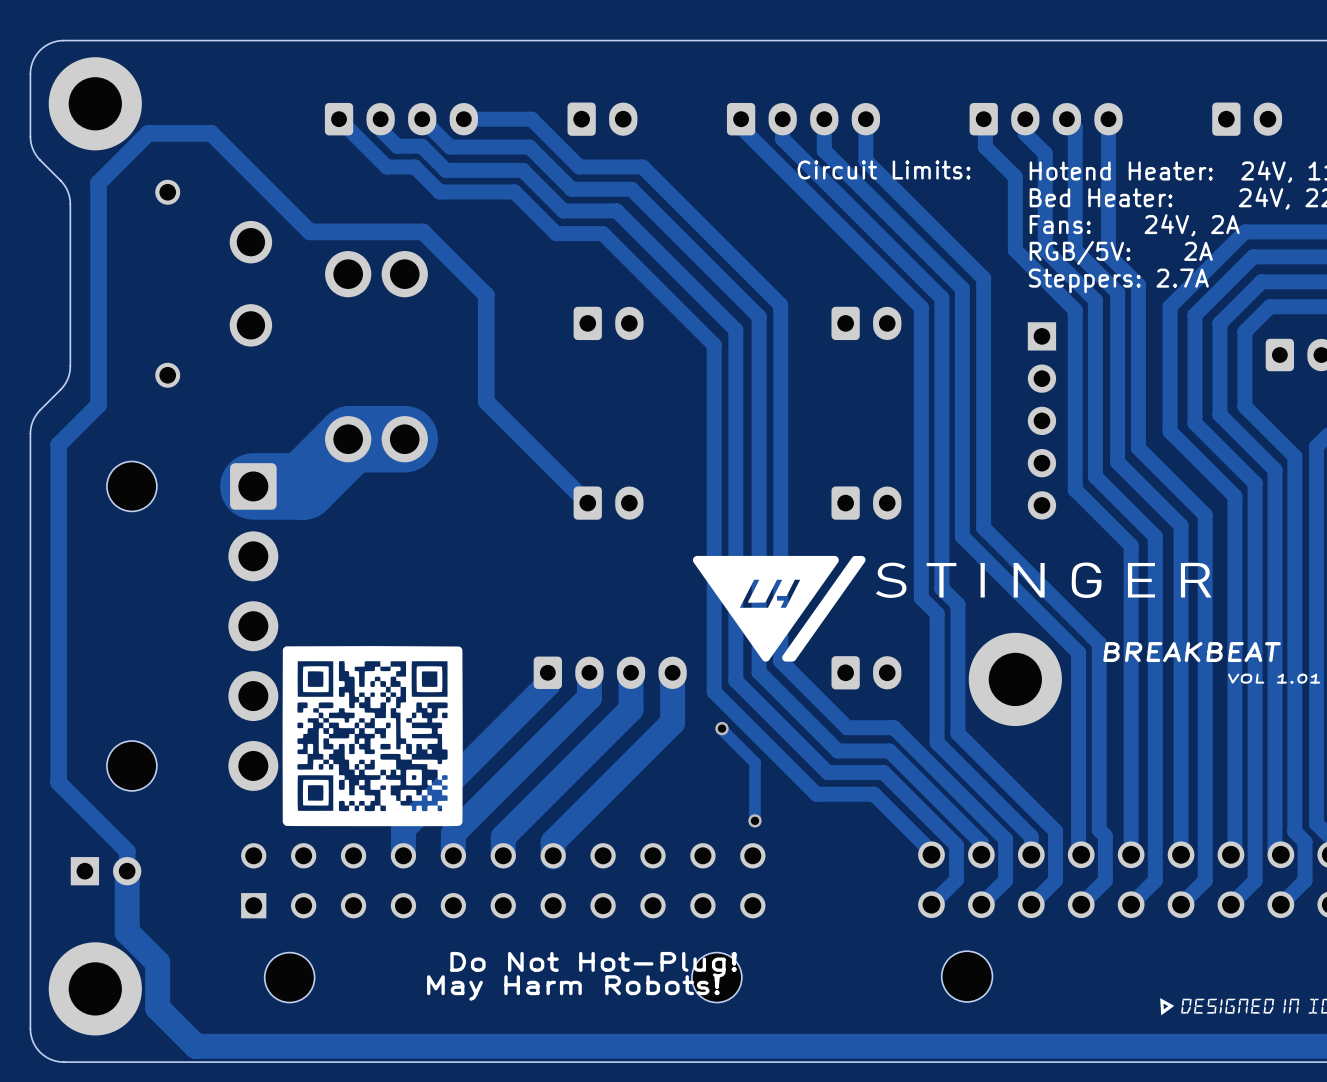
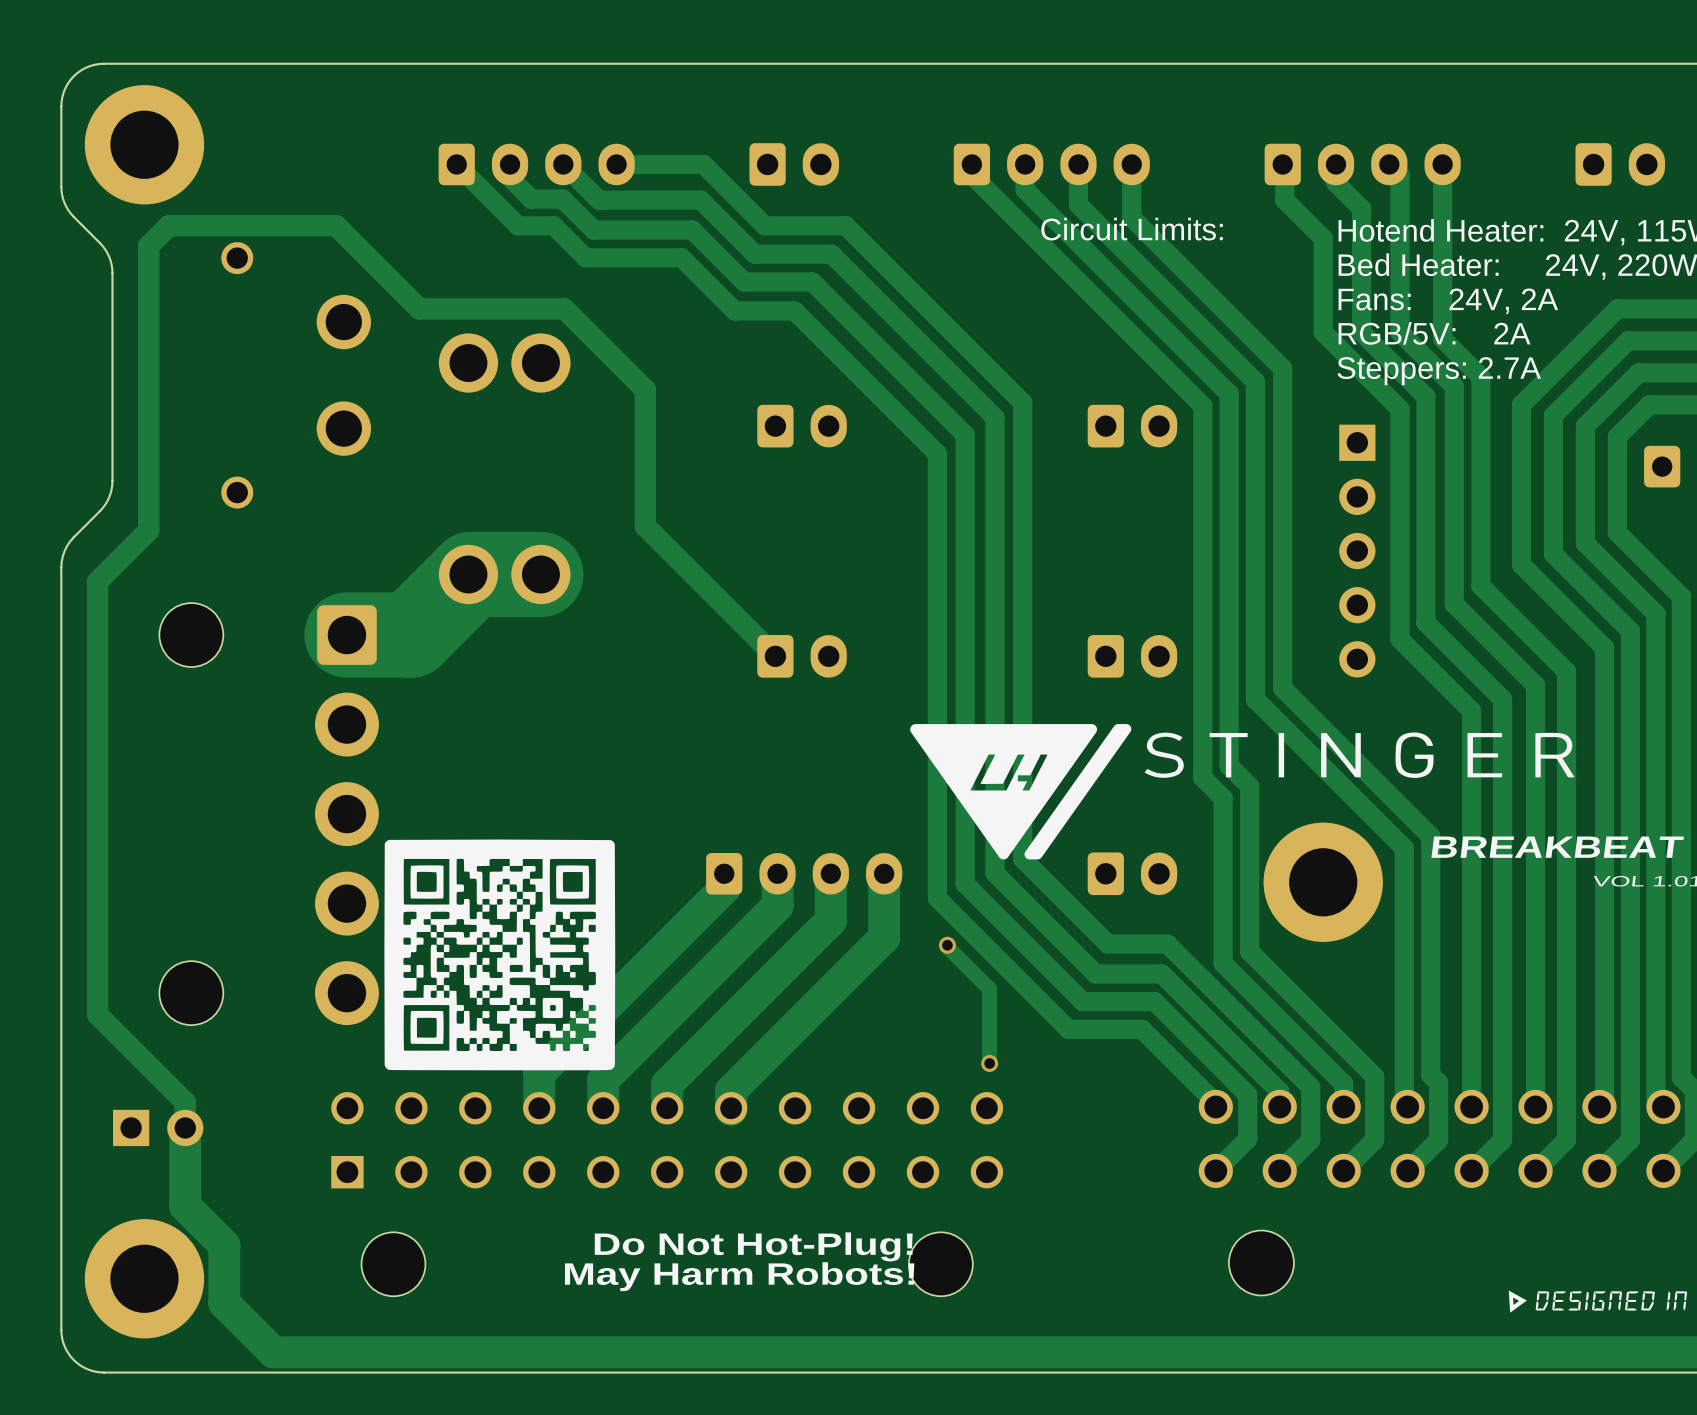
track: (245, 167) (211, 133) (148, 133) (114, 167) -> (336, 225) (168, 225)

